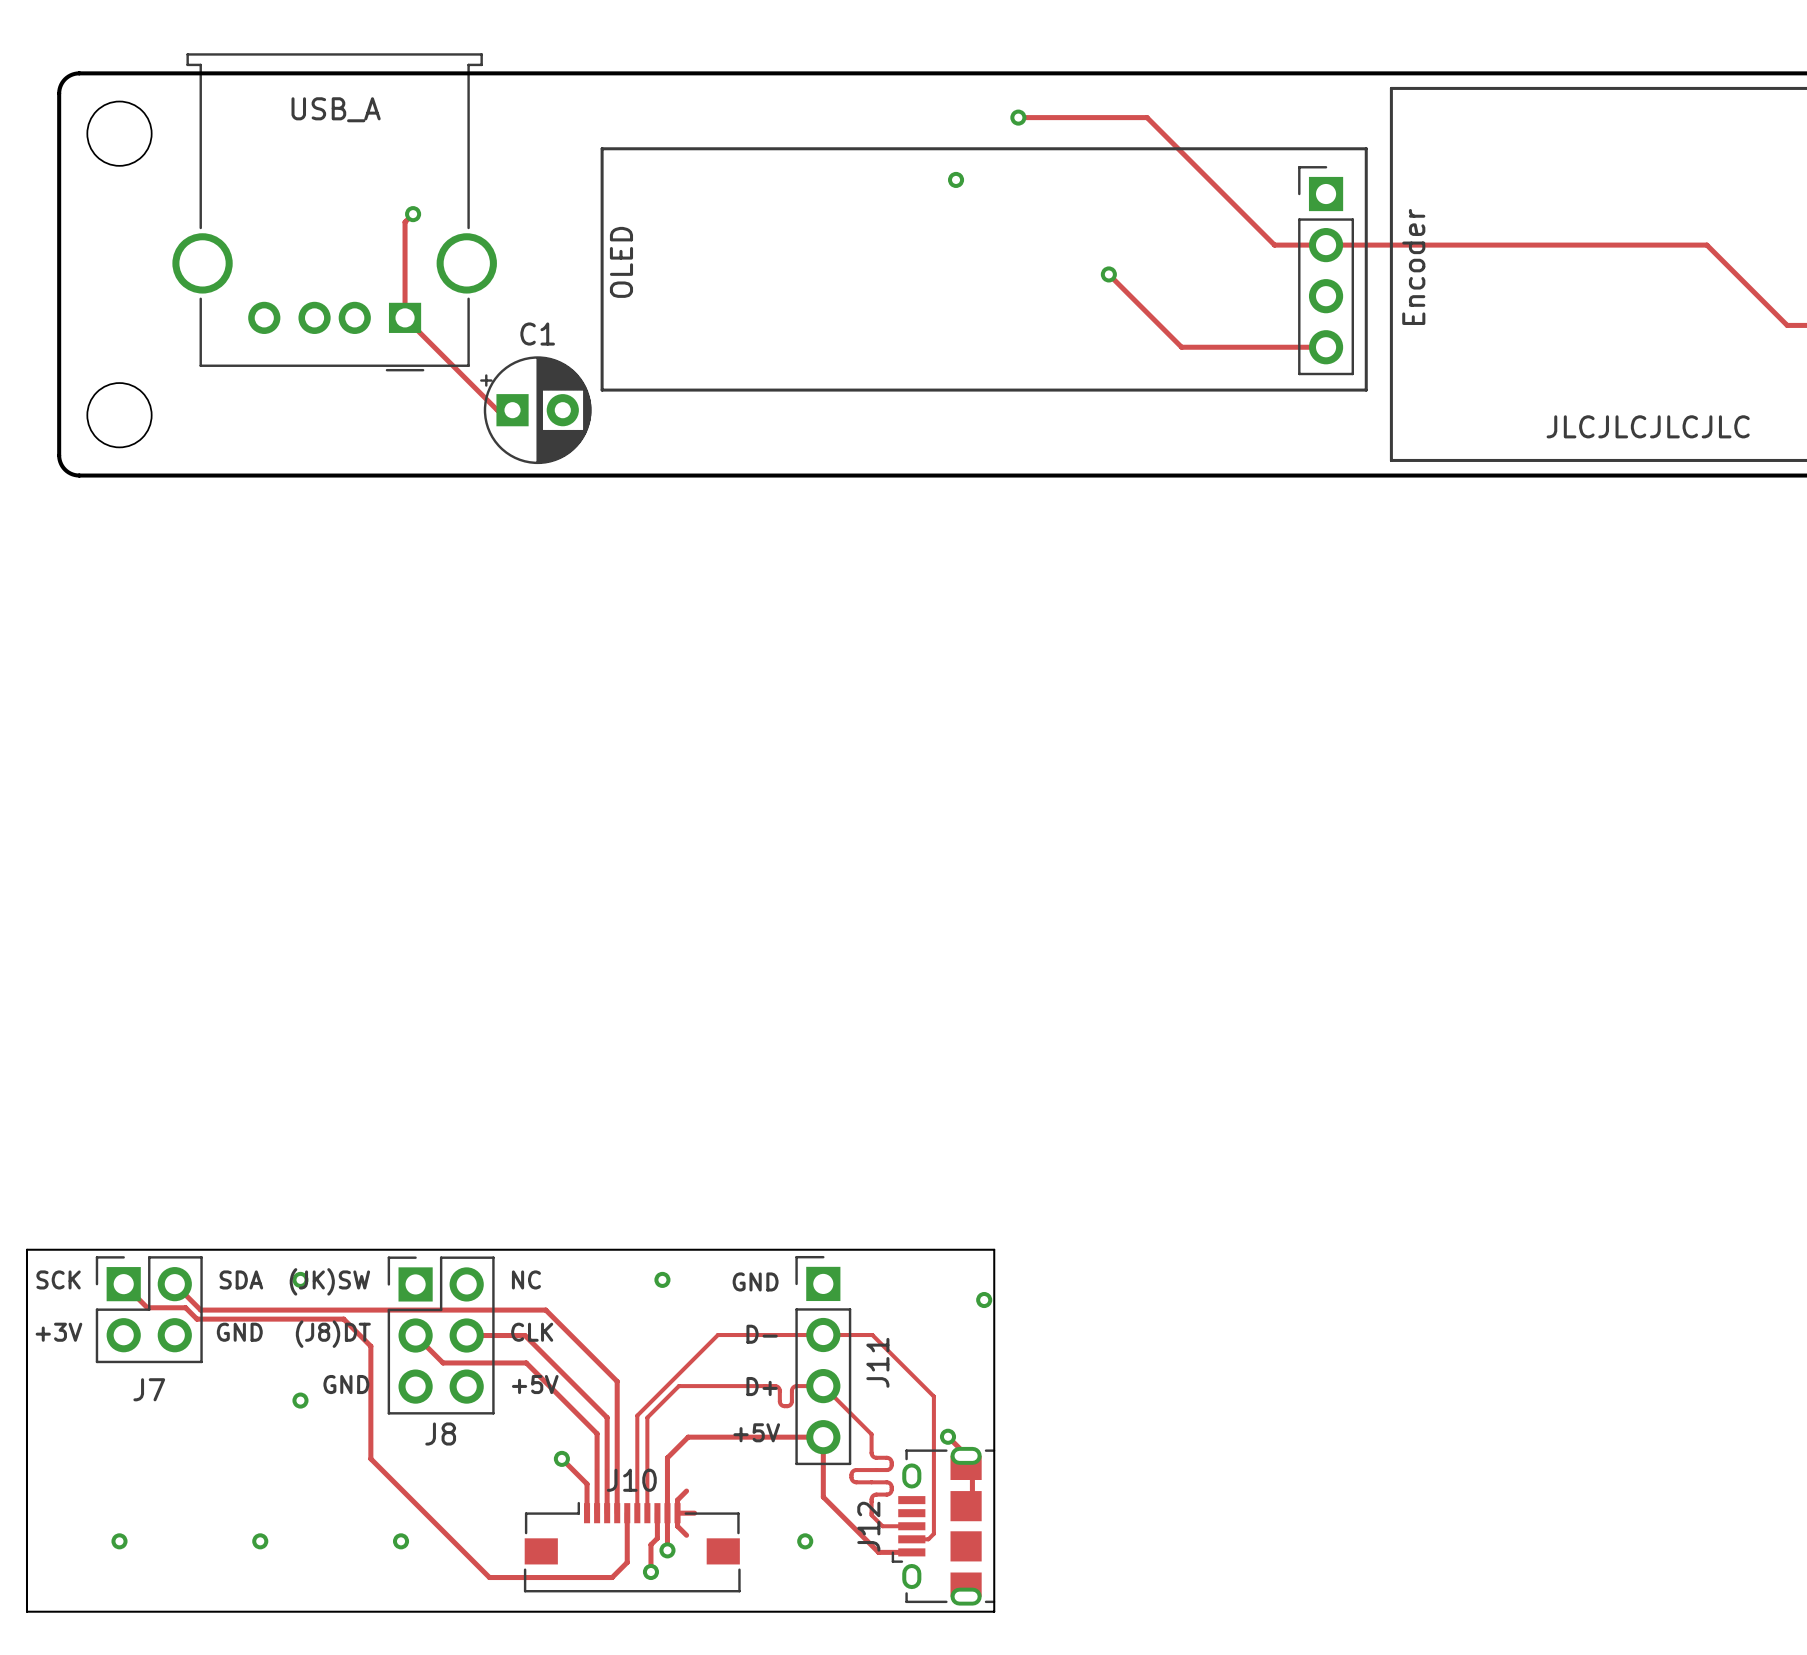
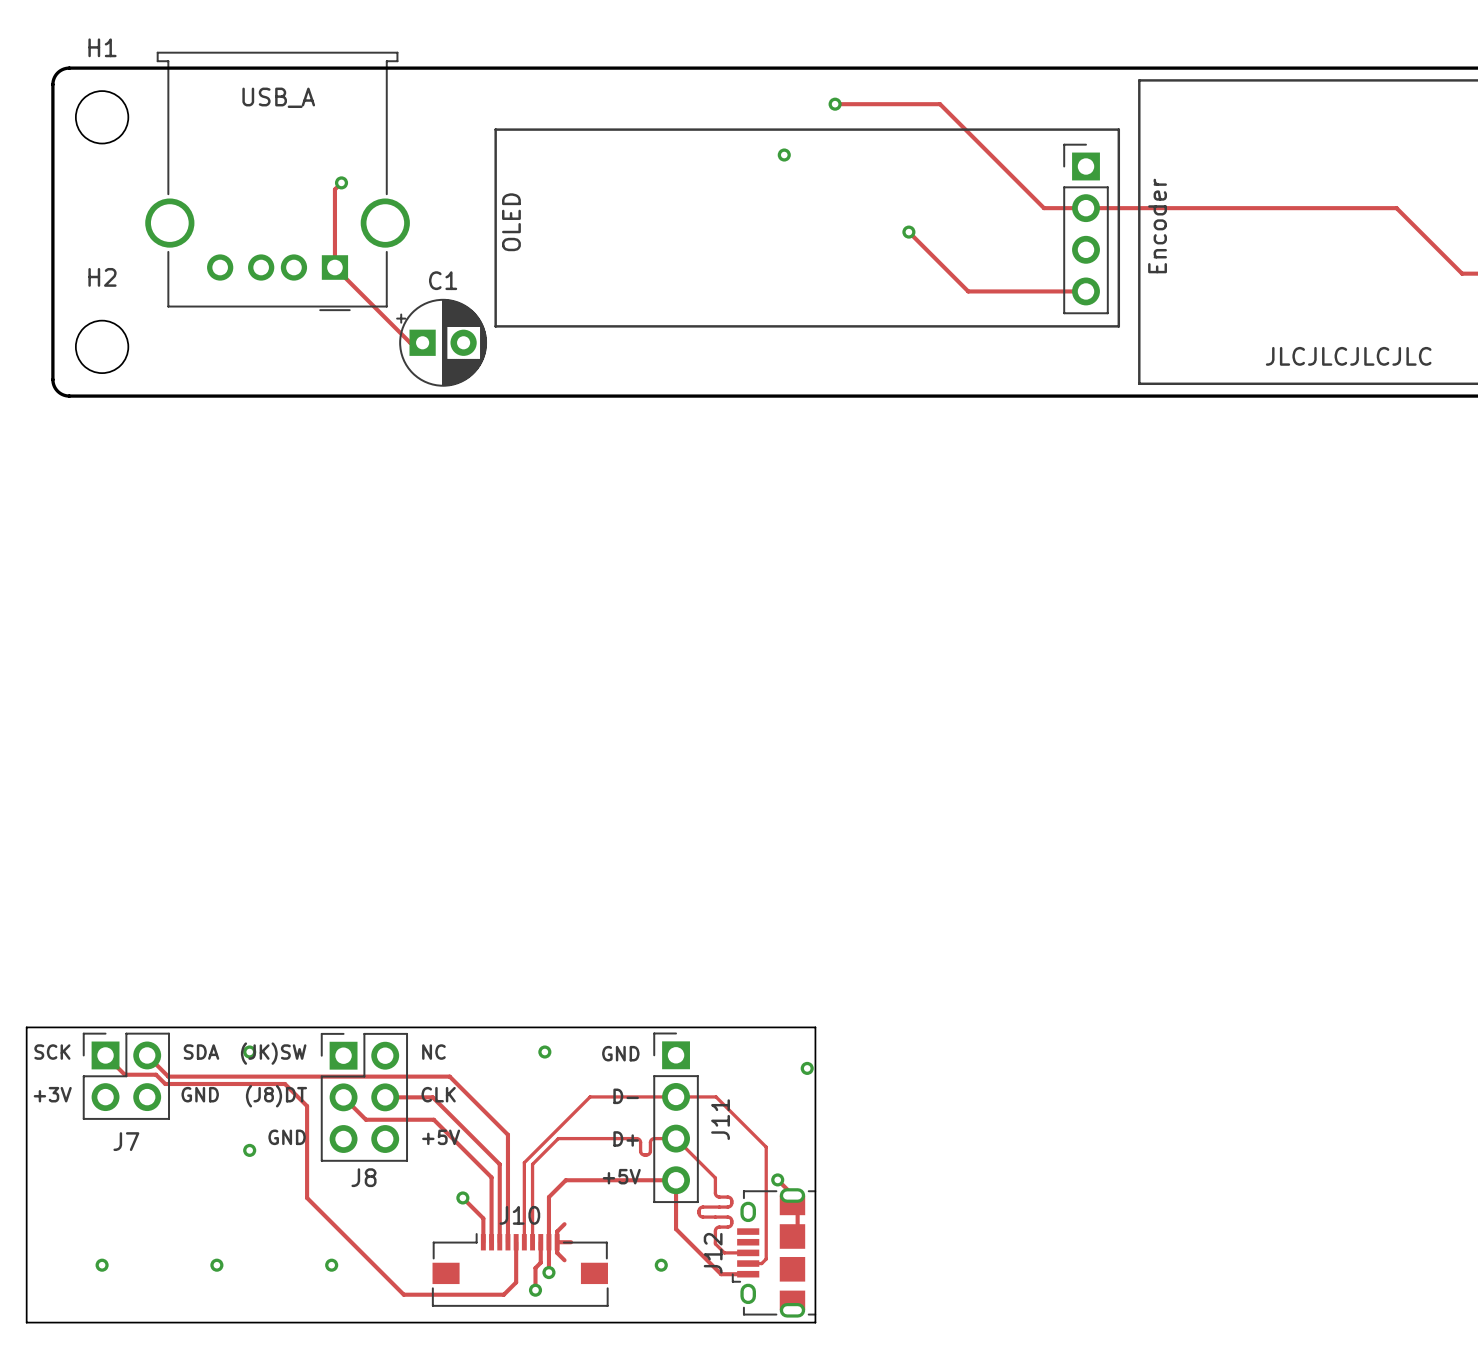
H1 name: none -> H1 (102, 47)
H2 name: none -> H2 (102, 277)

